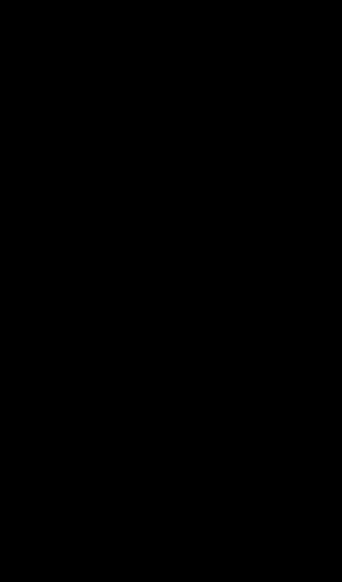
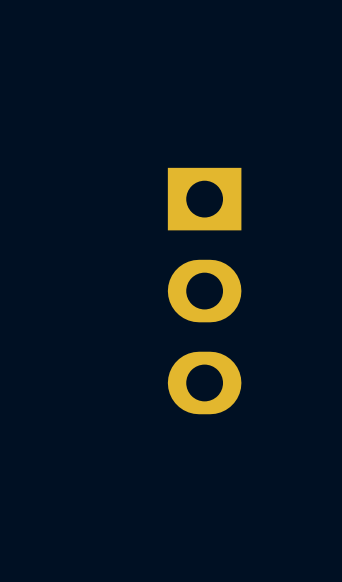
part: none -> (204, 291)

